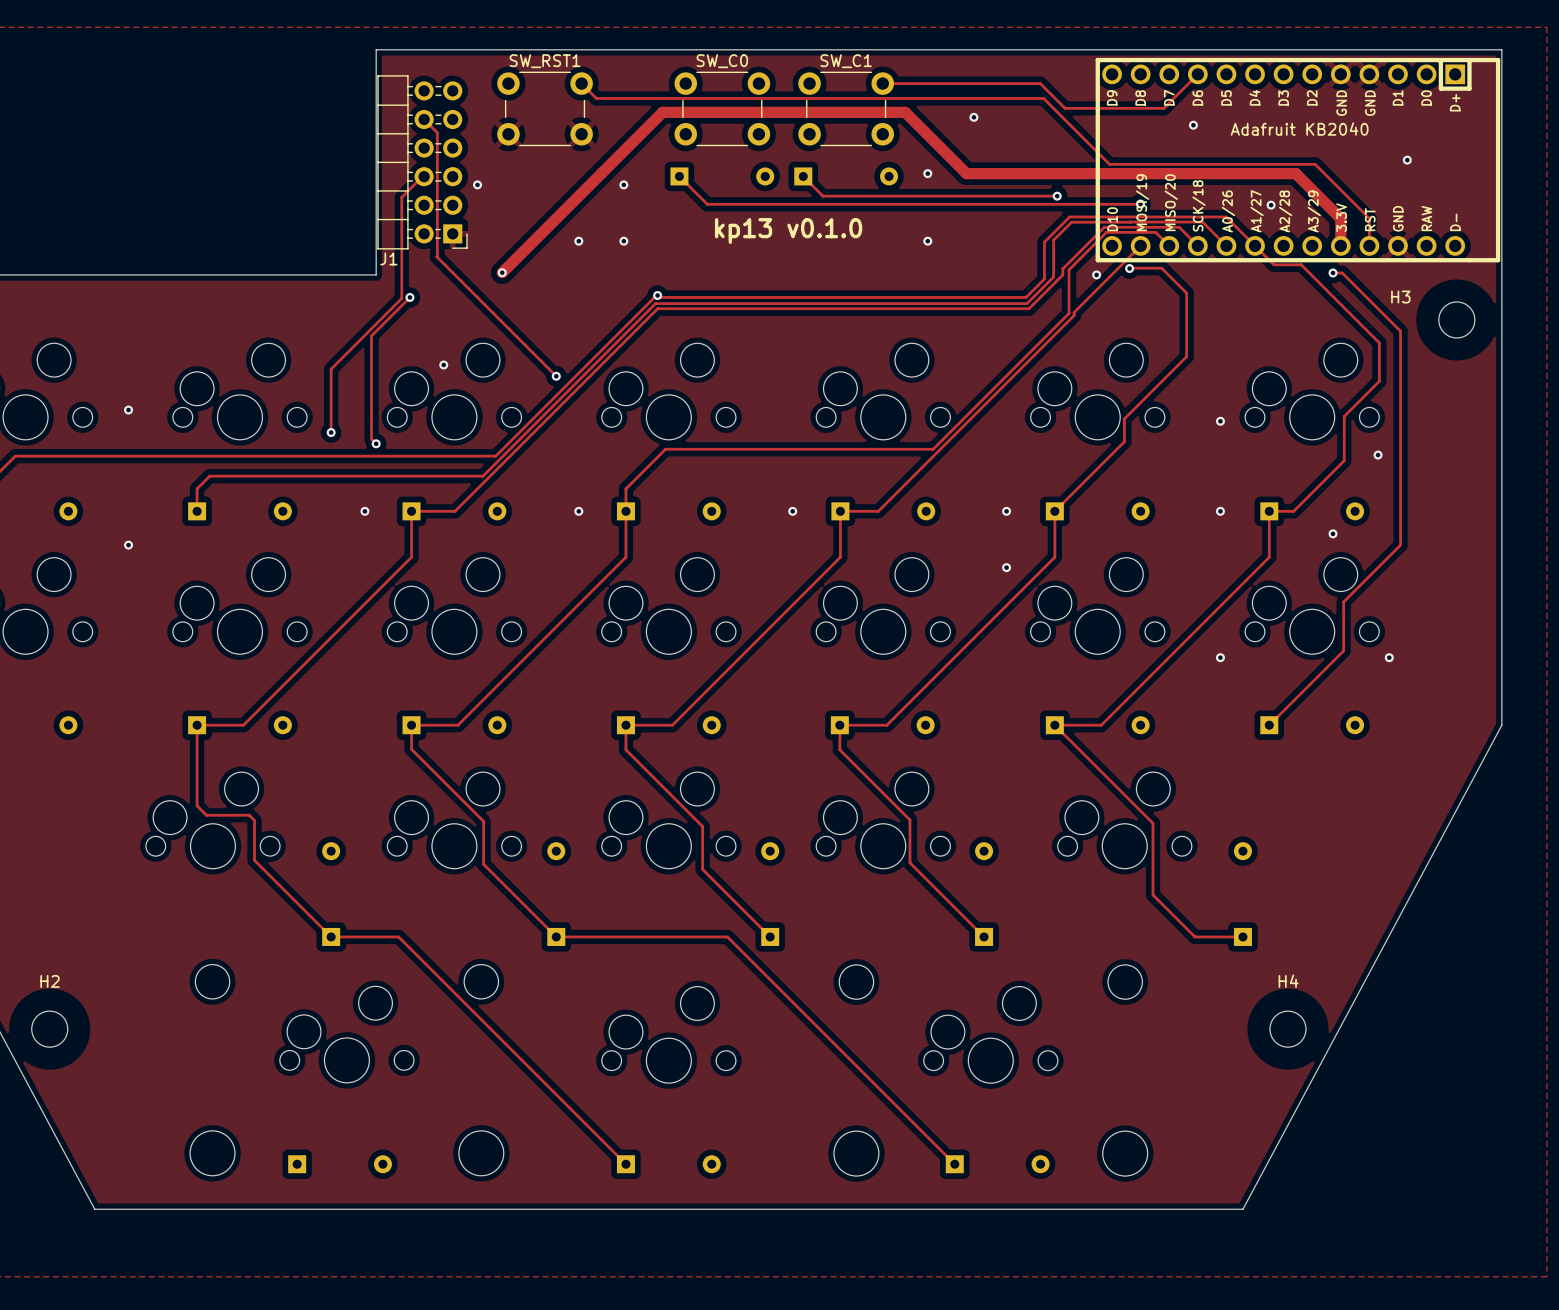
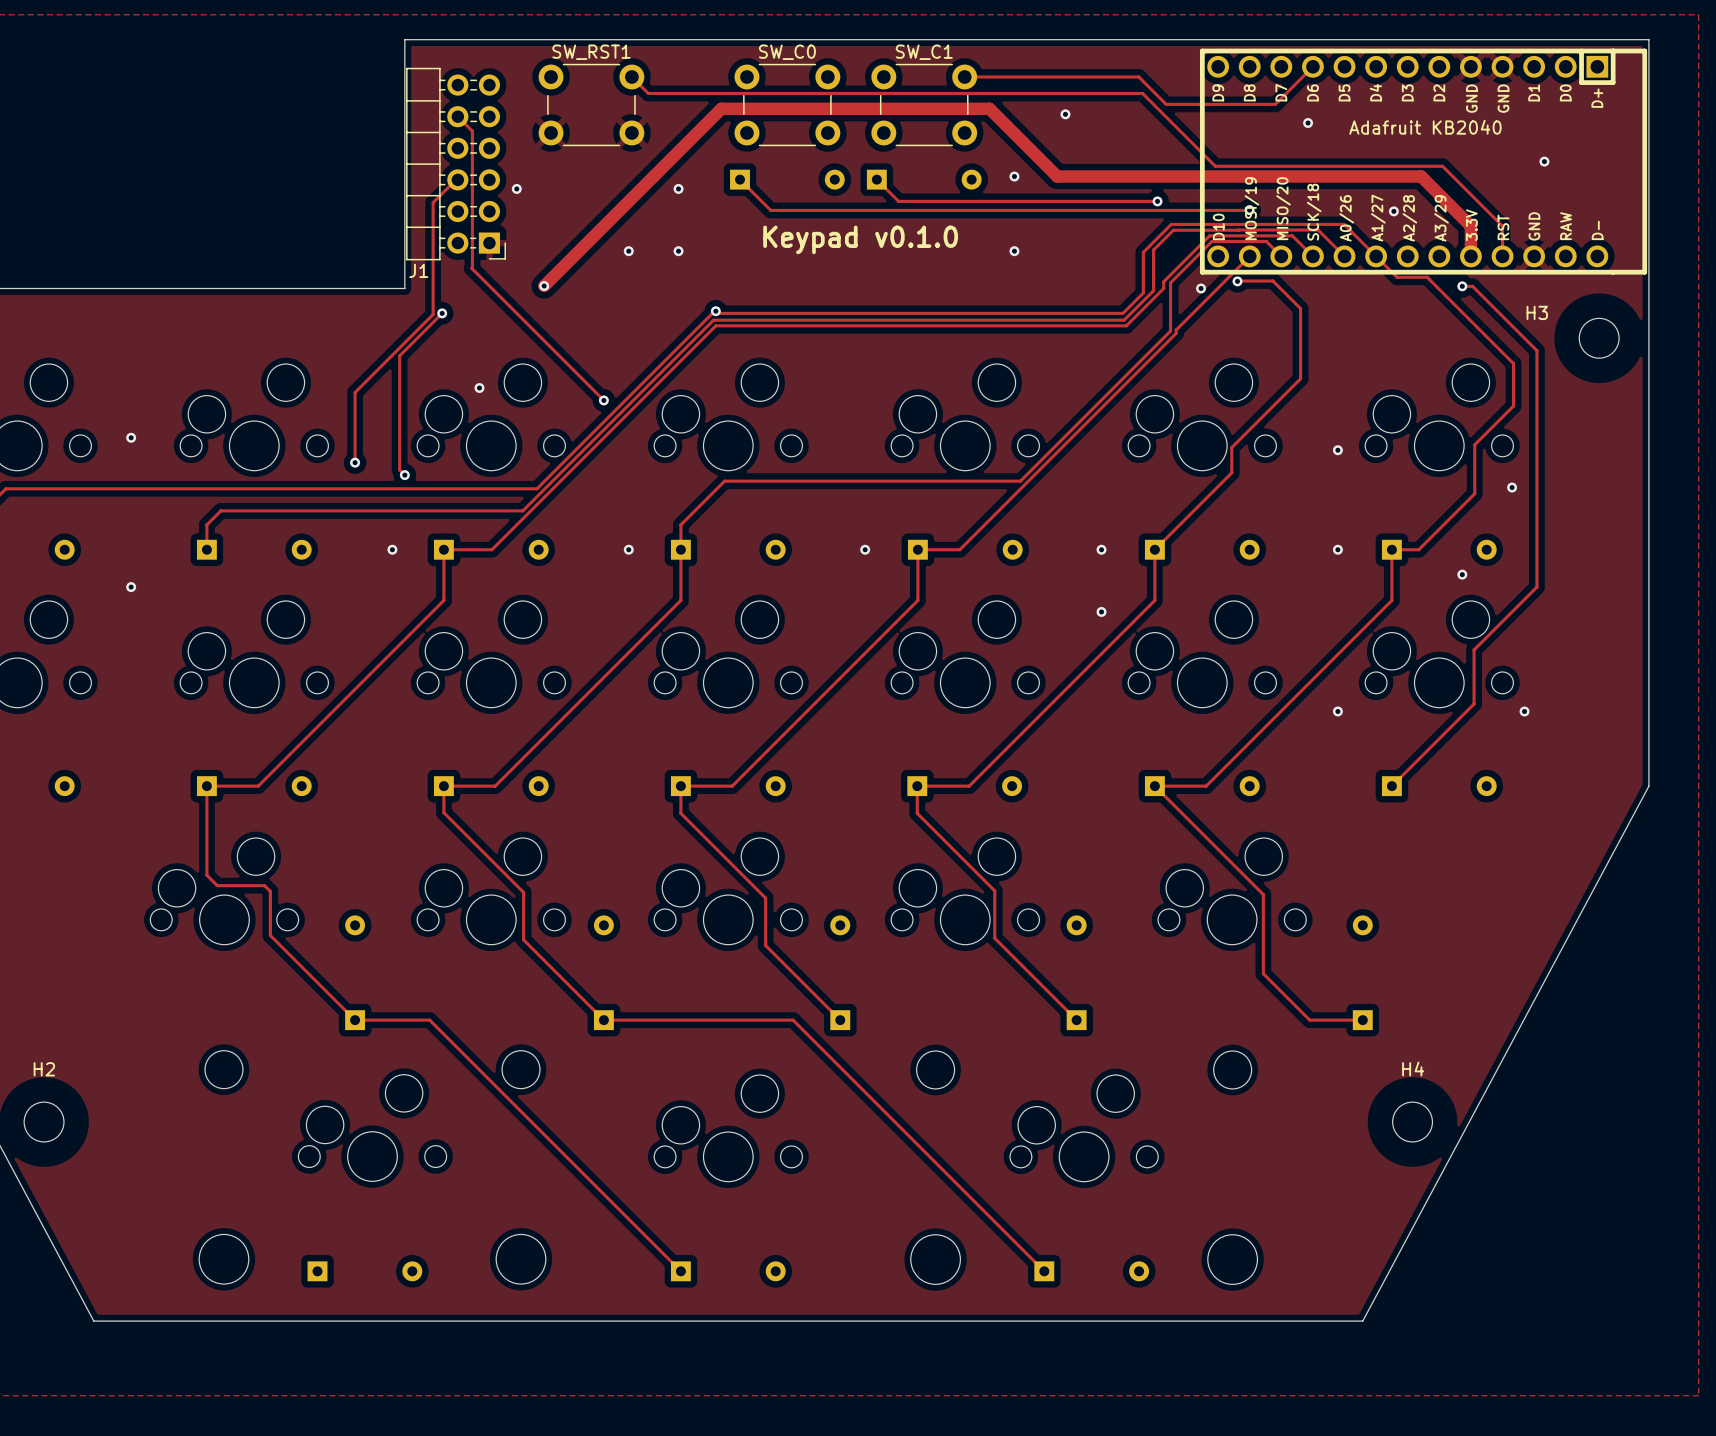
text: kp13 v0.1.0 (788, 230) -> Keypad v0.1.0 (860, 239)

